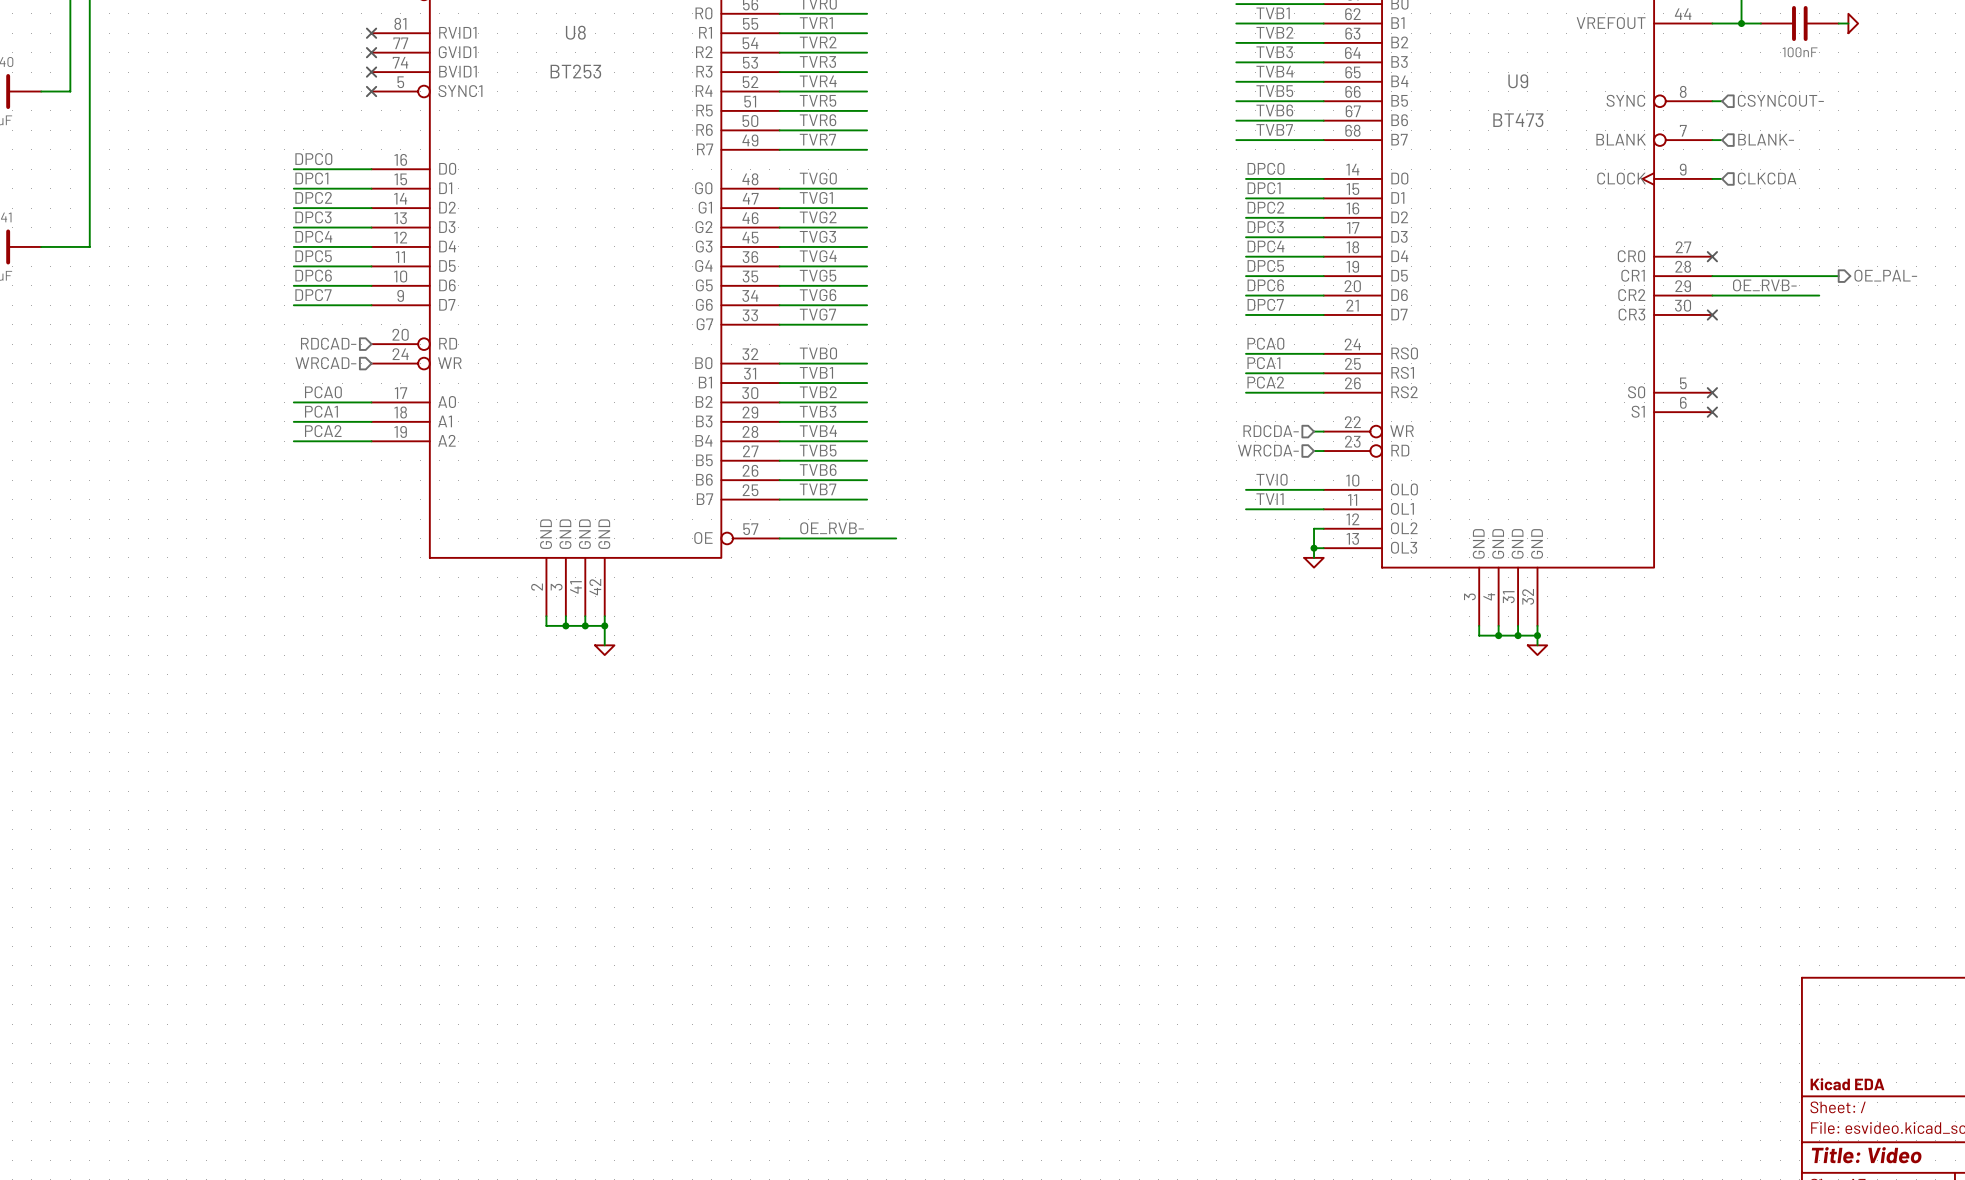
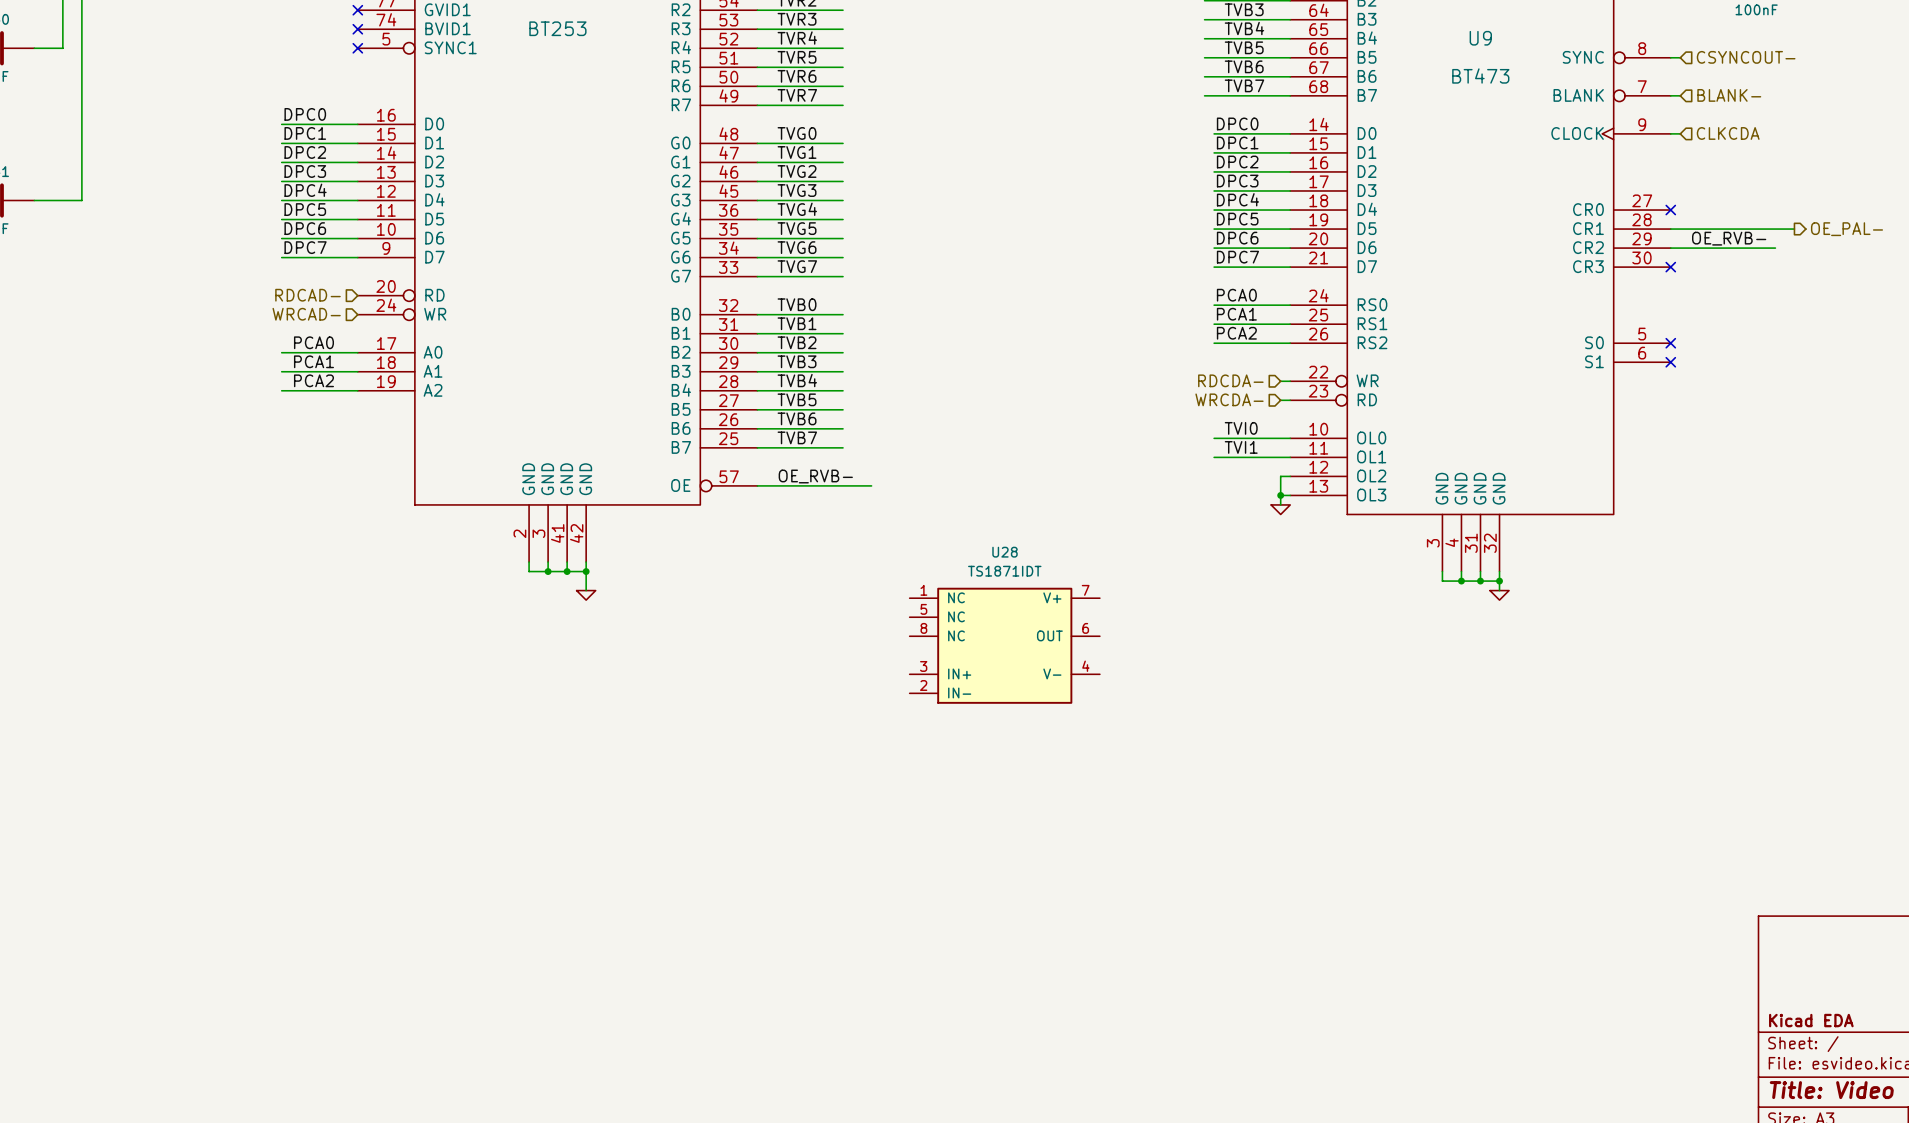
U28: none -> TS1871IDT (1004, 645)

